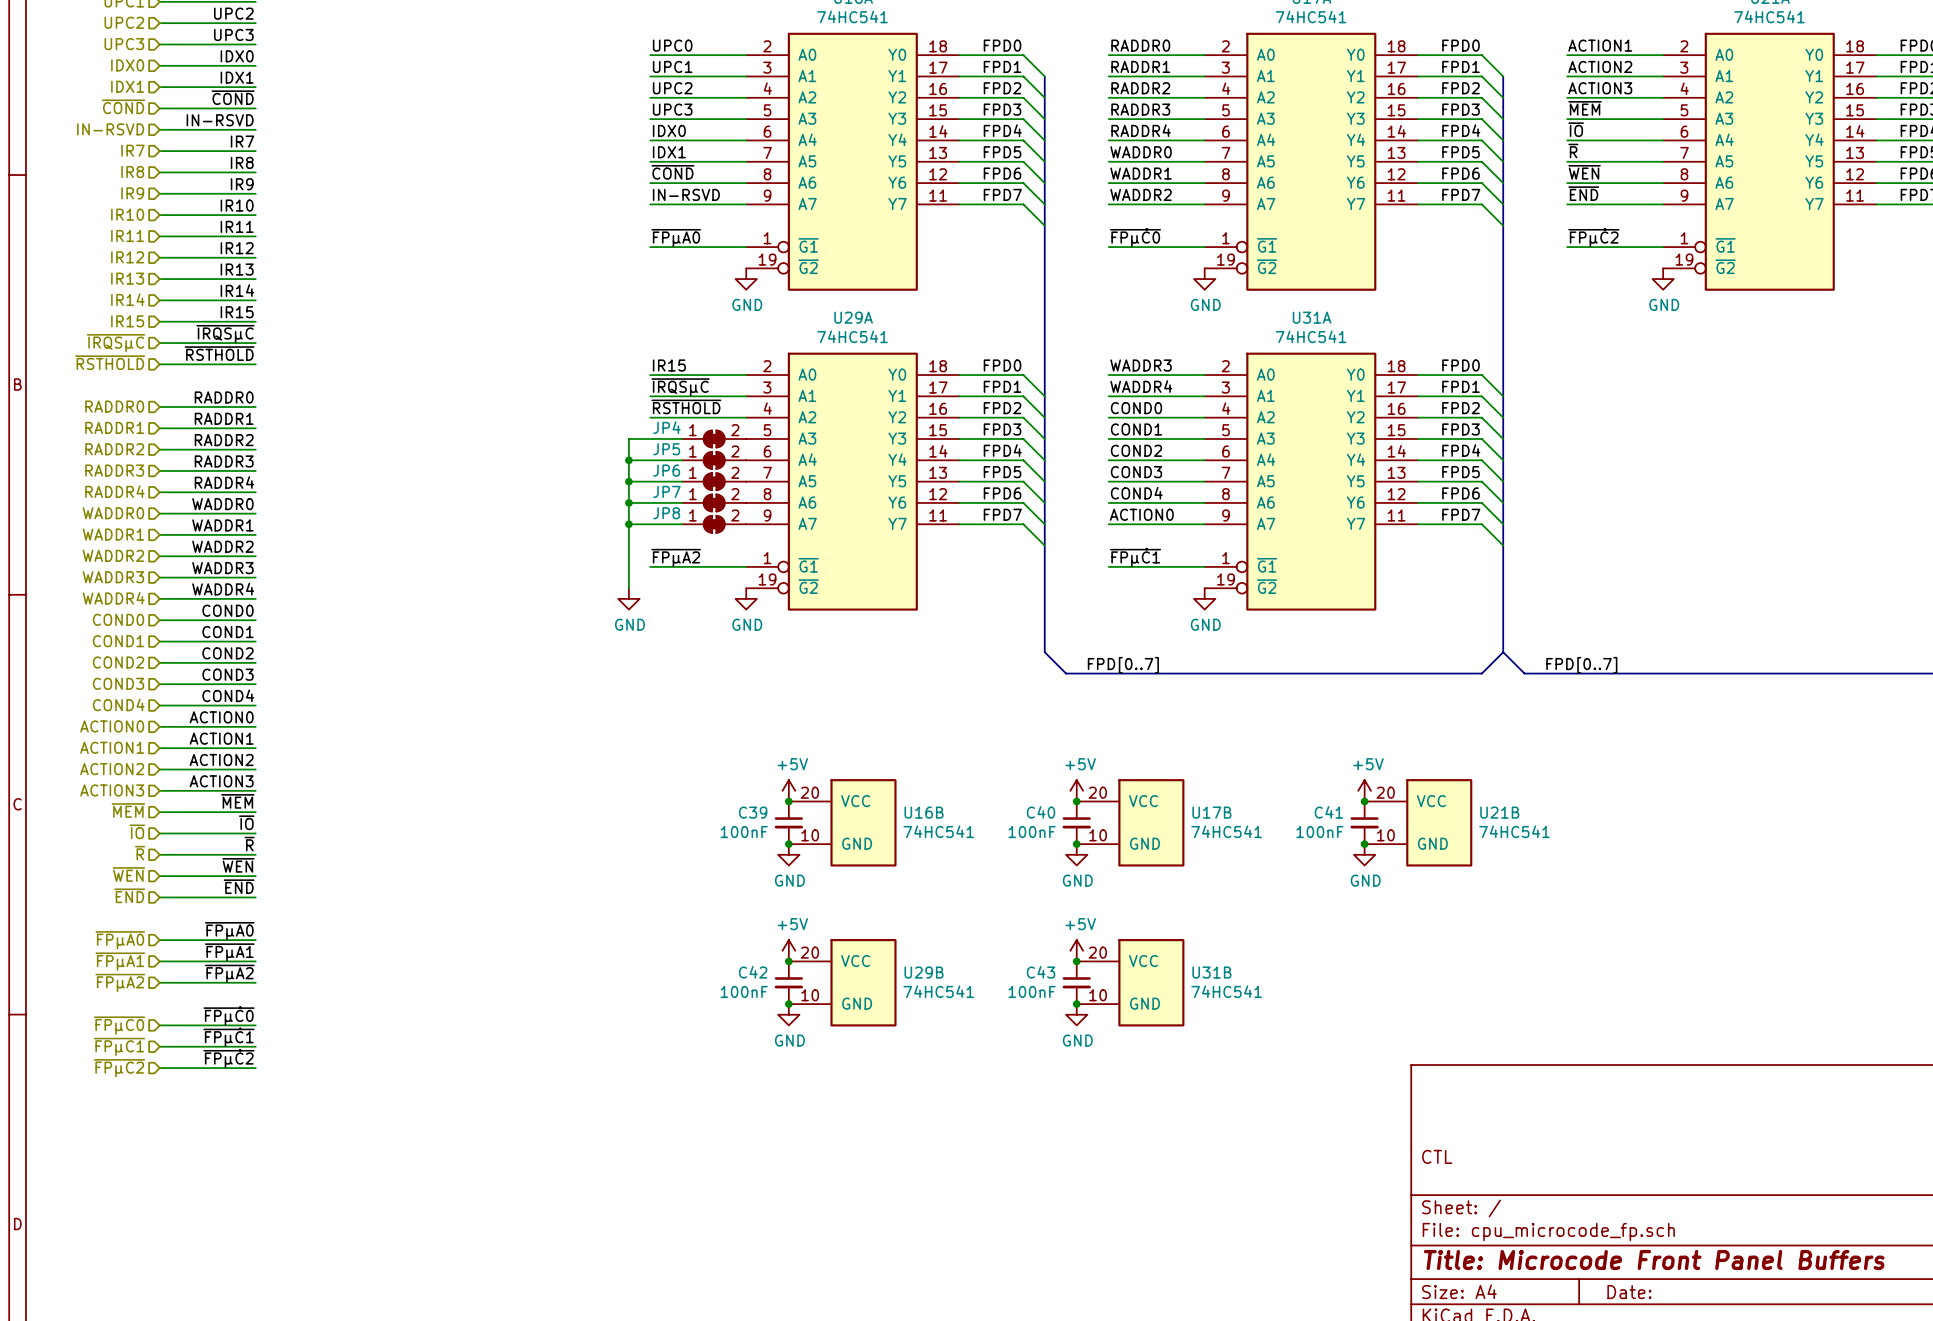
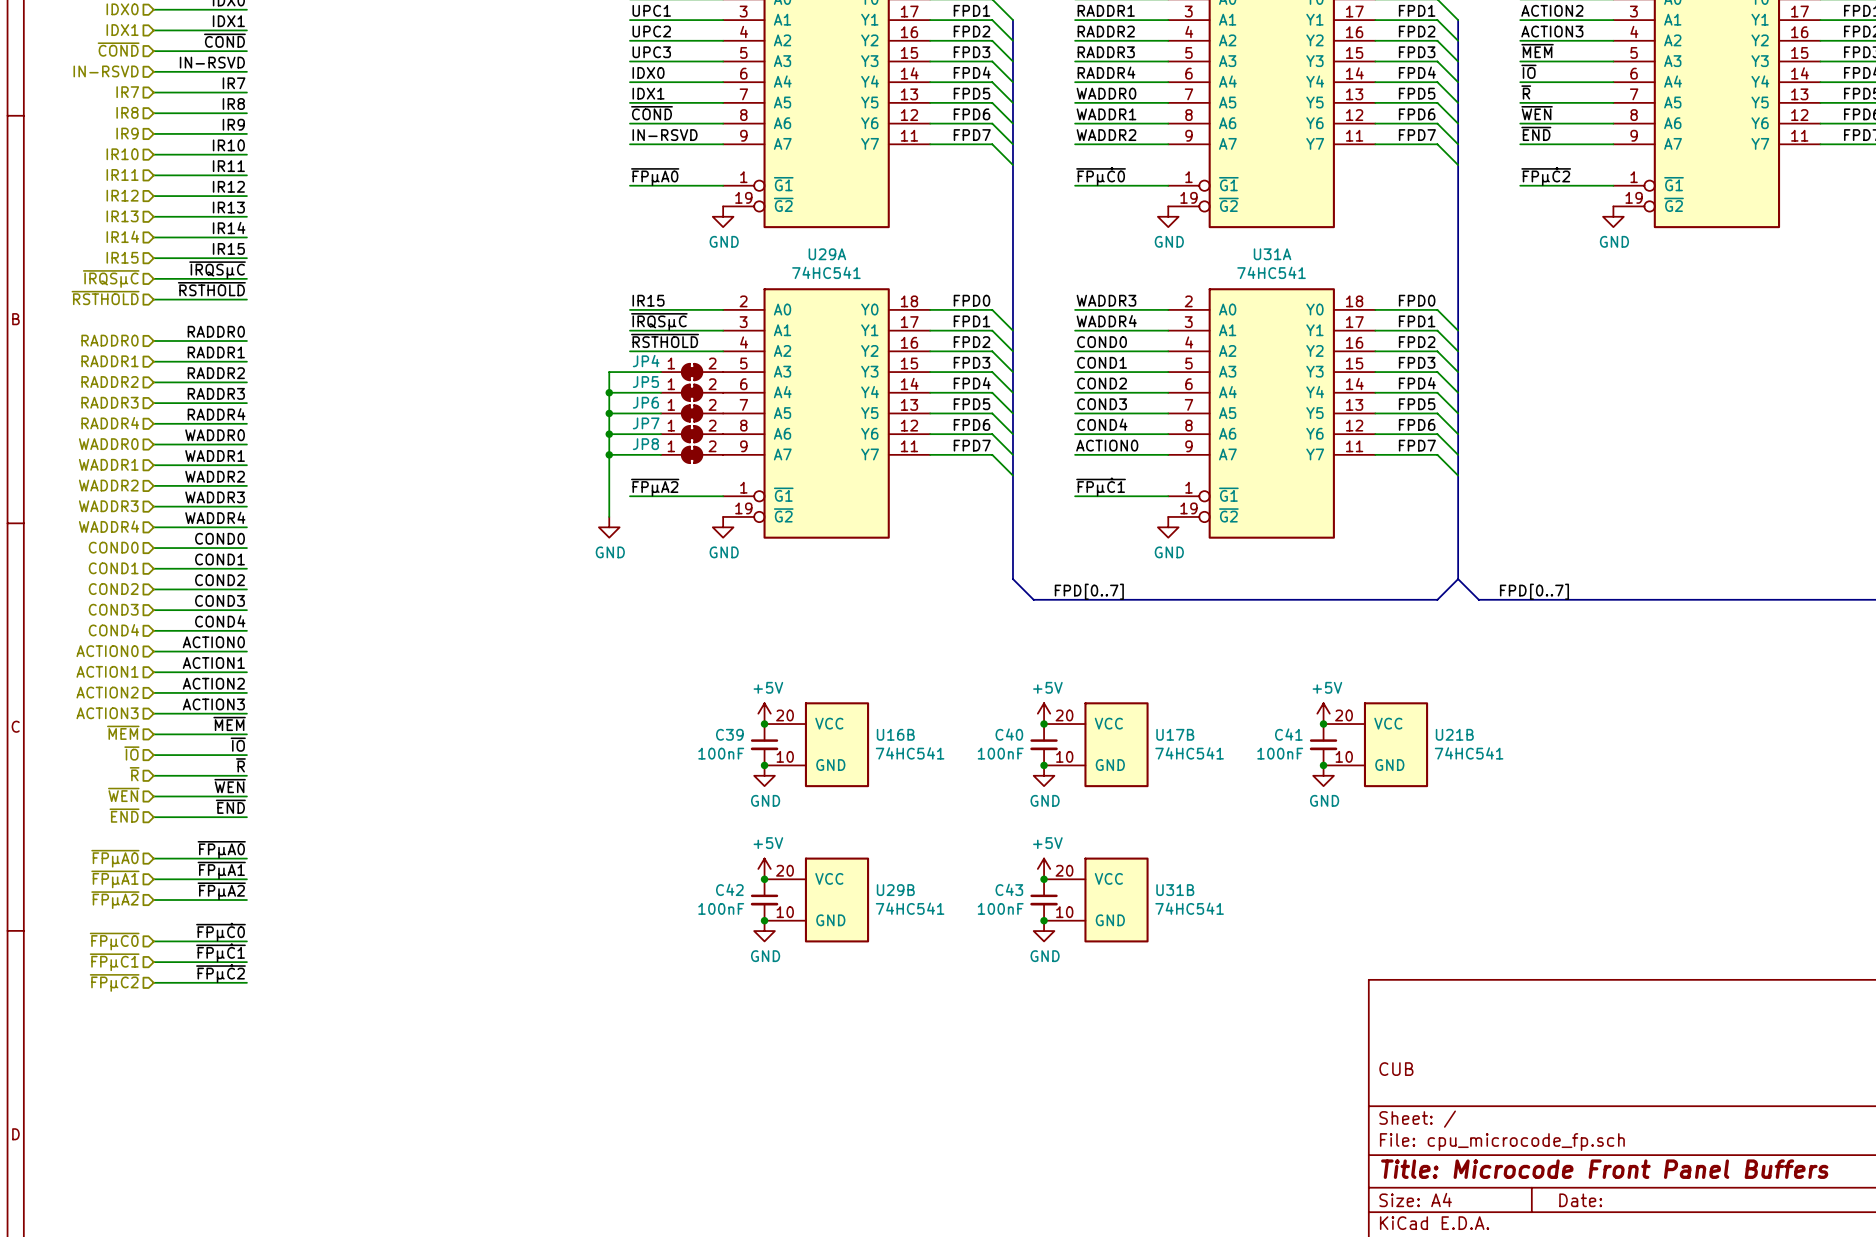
title block: CTL (1437, 1156) -> CUB (1396, 1069)

